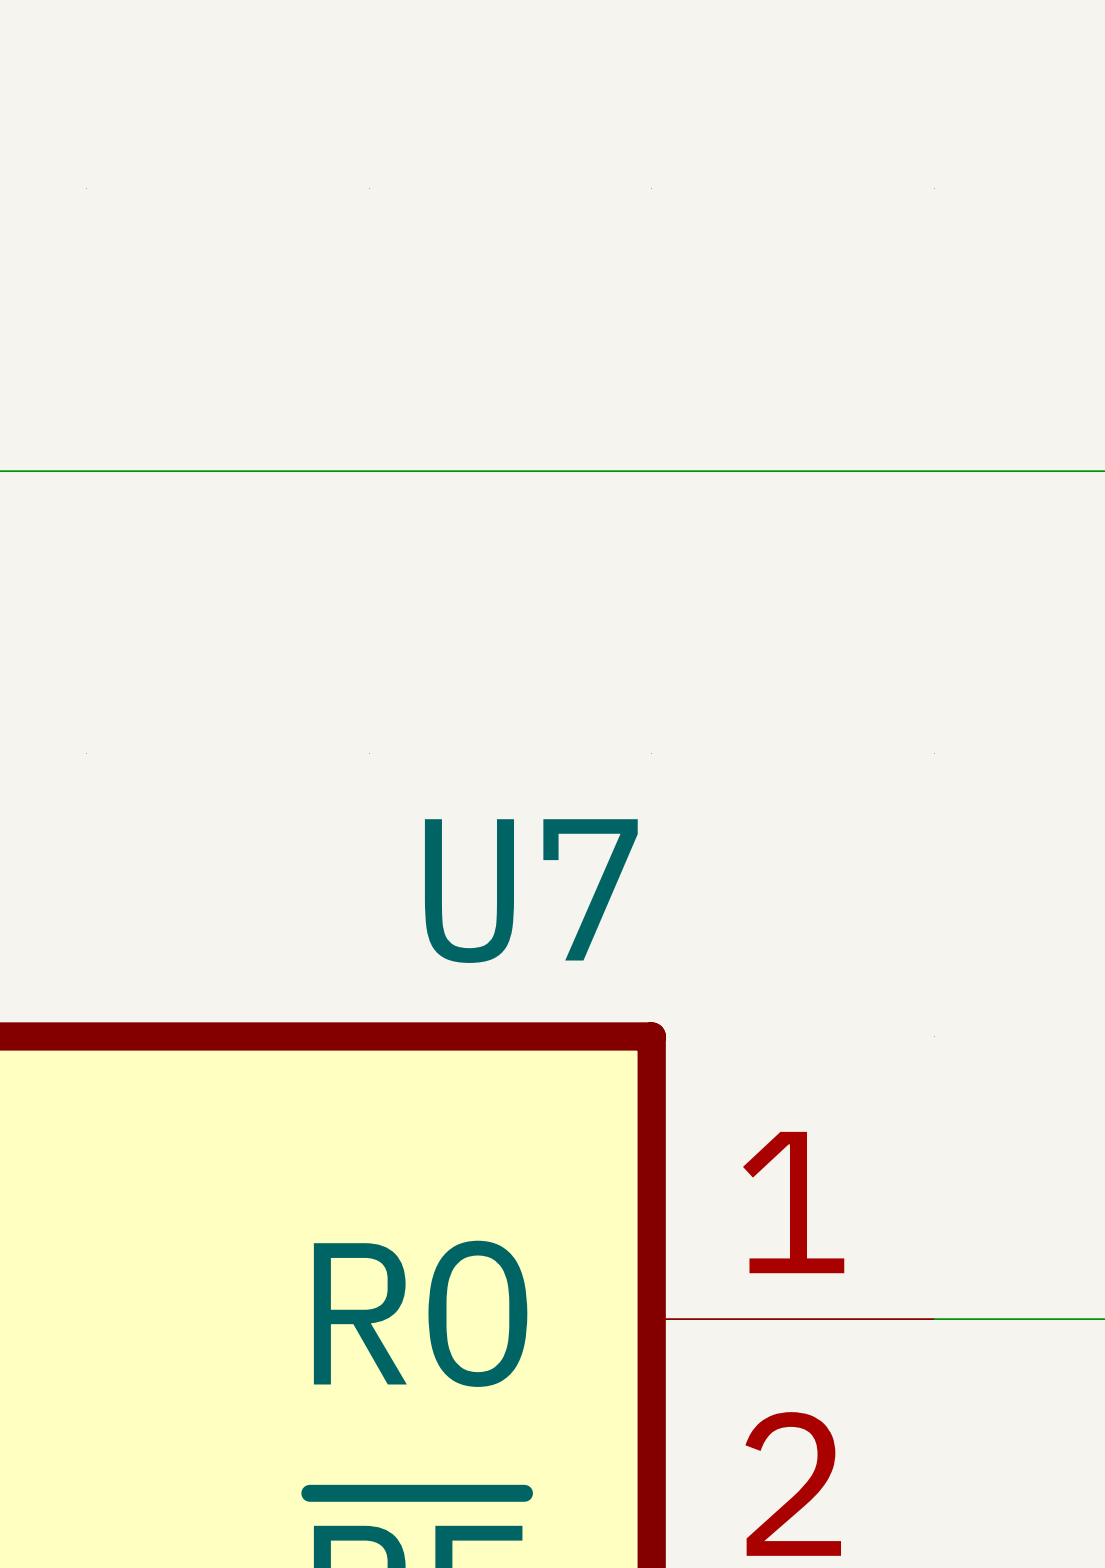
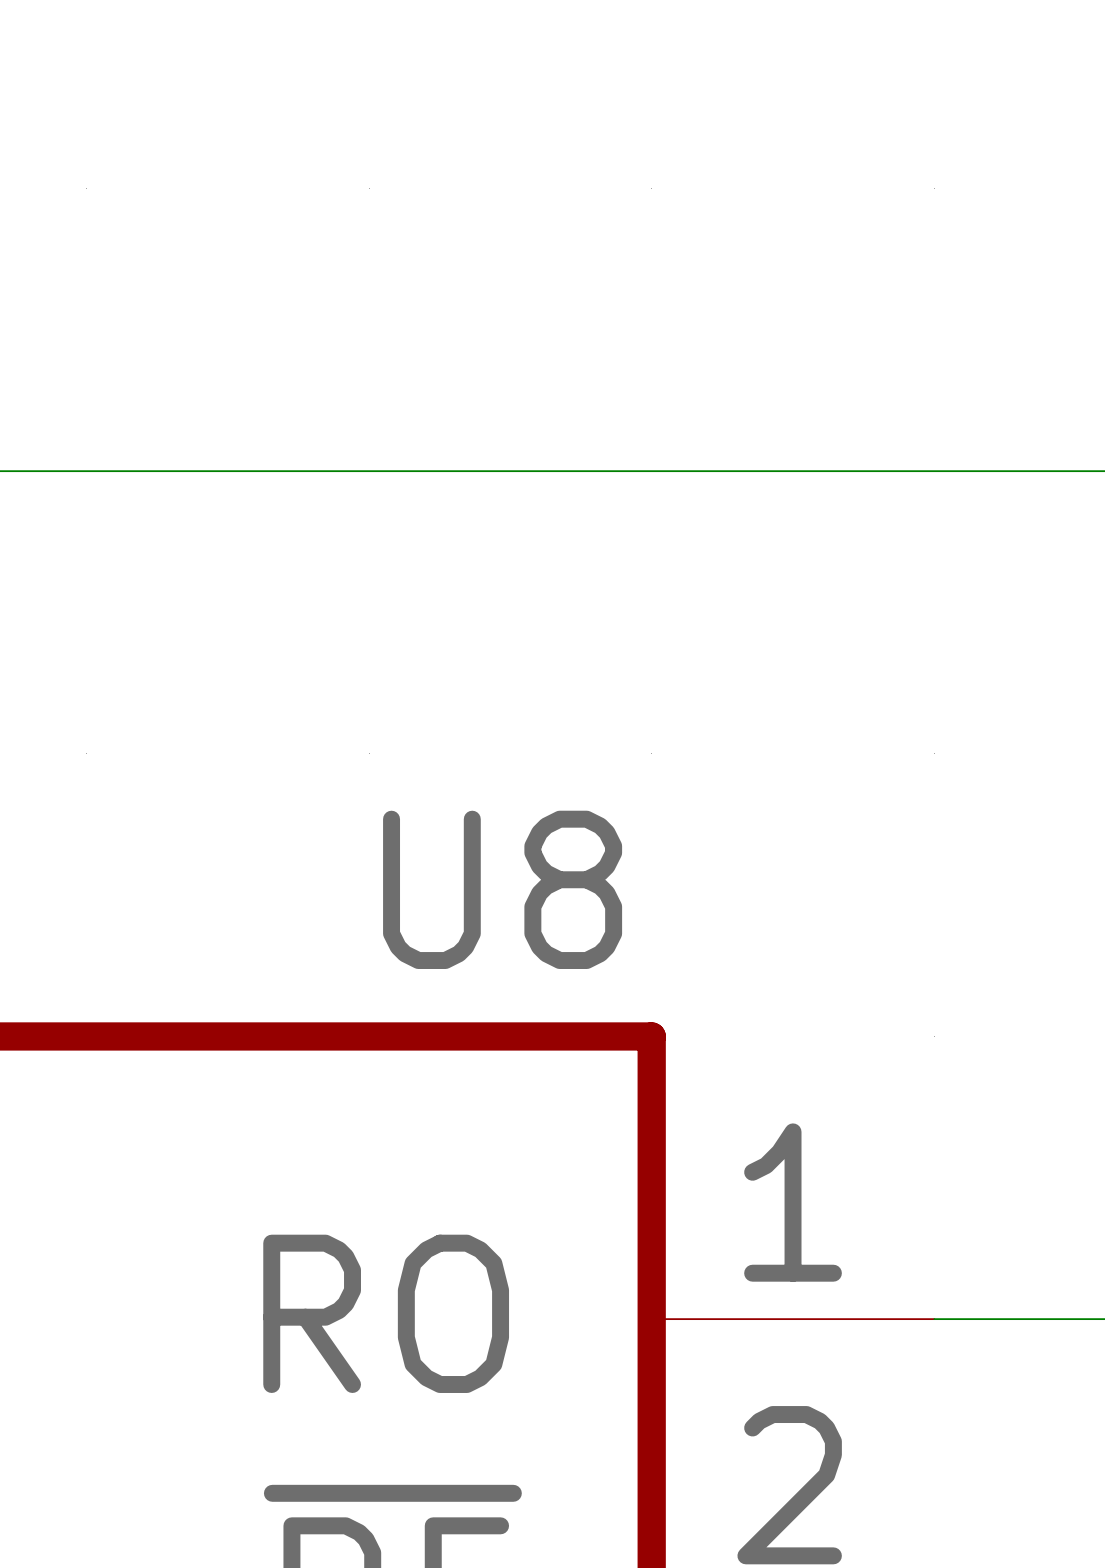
U7 name: U7 (531, 891) -> U8 (502, 889)

